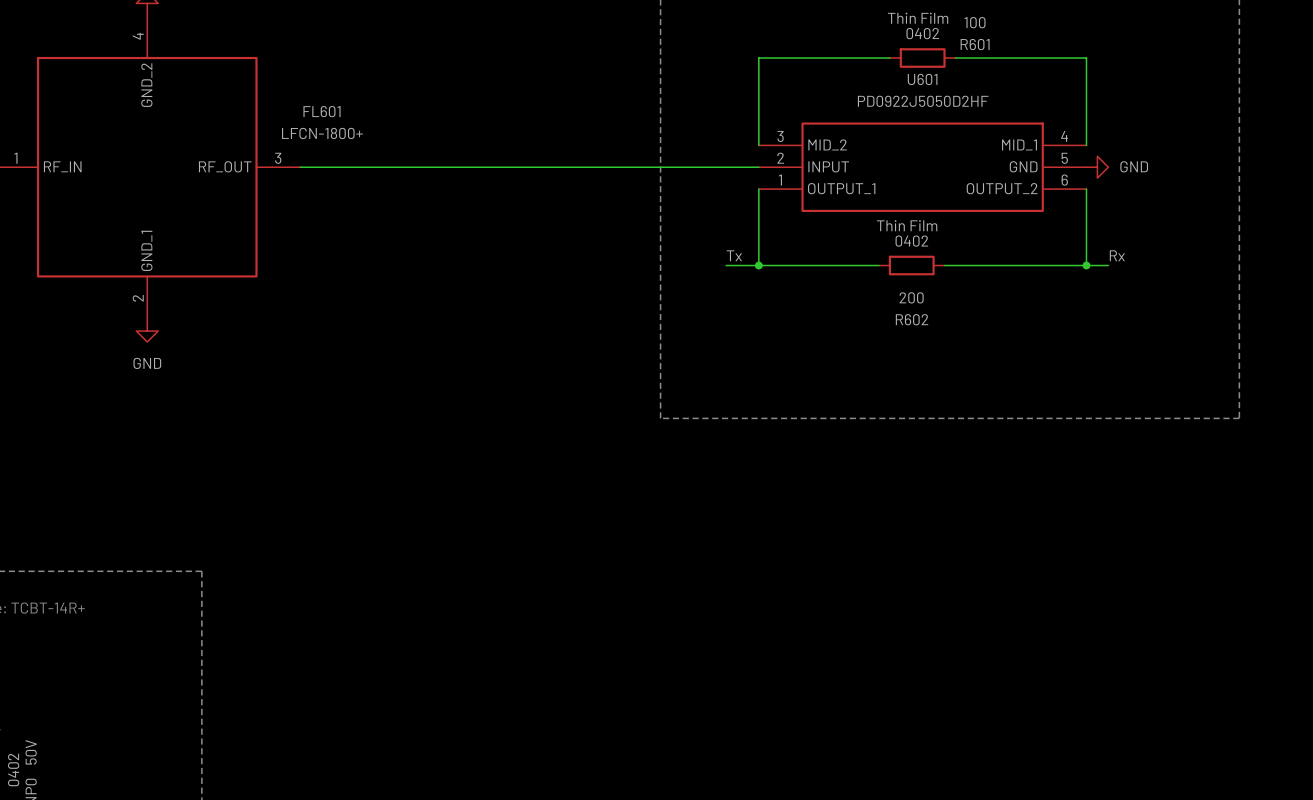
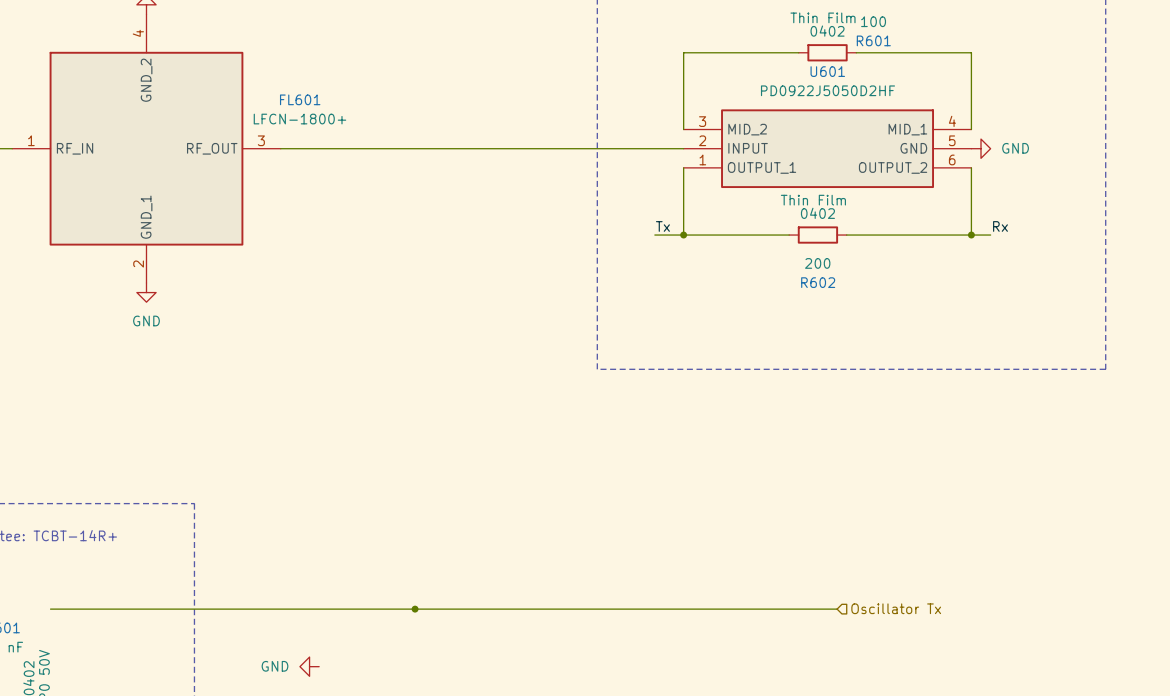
wire: none -> (50, 609) (837, 609)
junction: none -> (415, 609)
hierarchical label: none -> Oscillator Tx (896, 608)
power symbol: none -> GND (309, 666)

